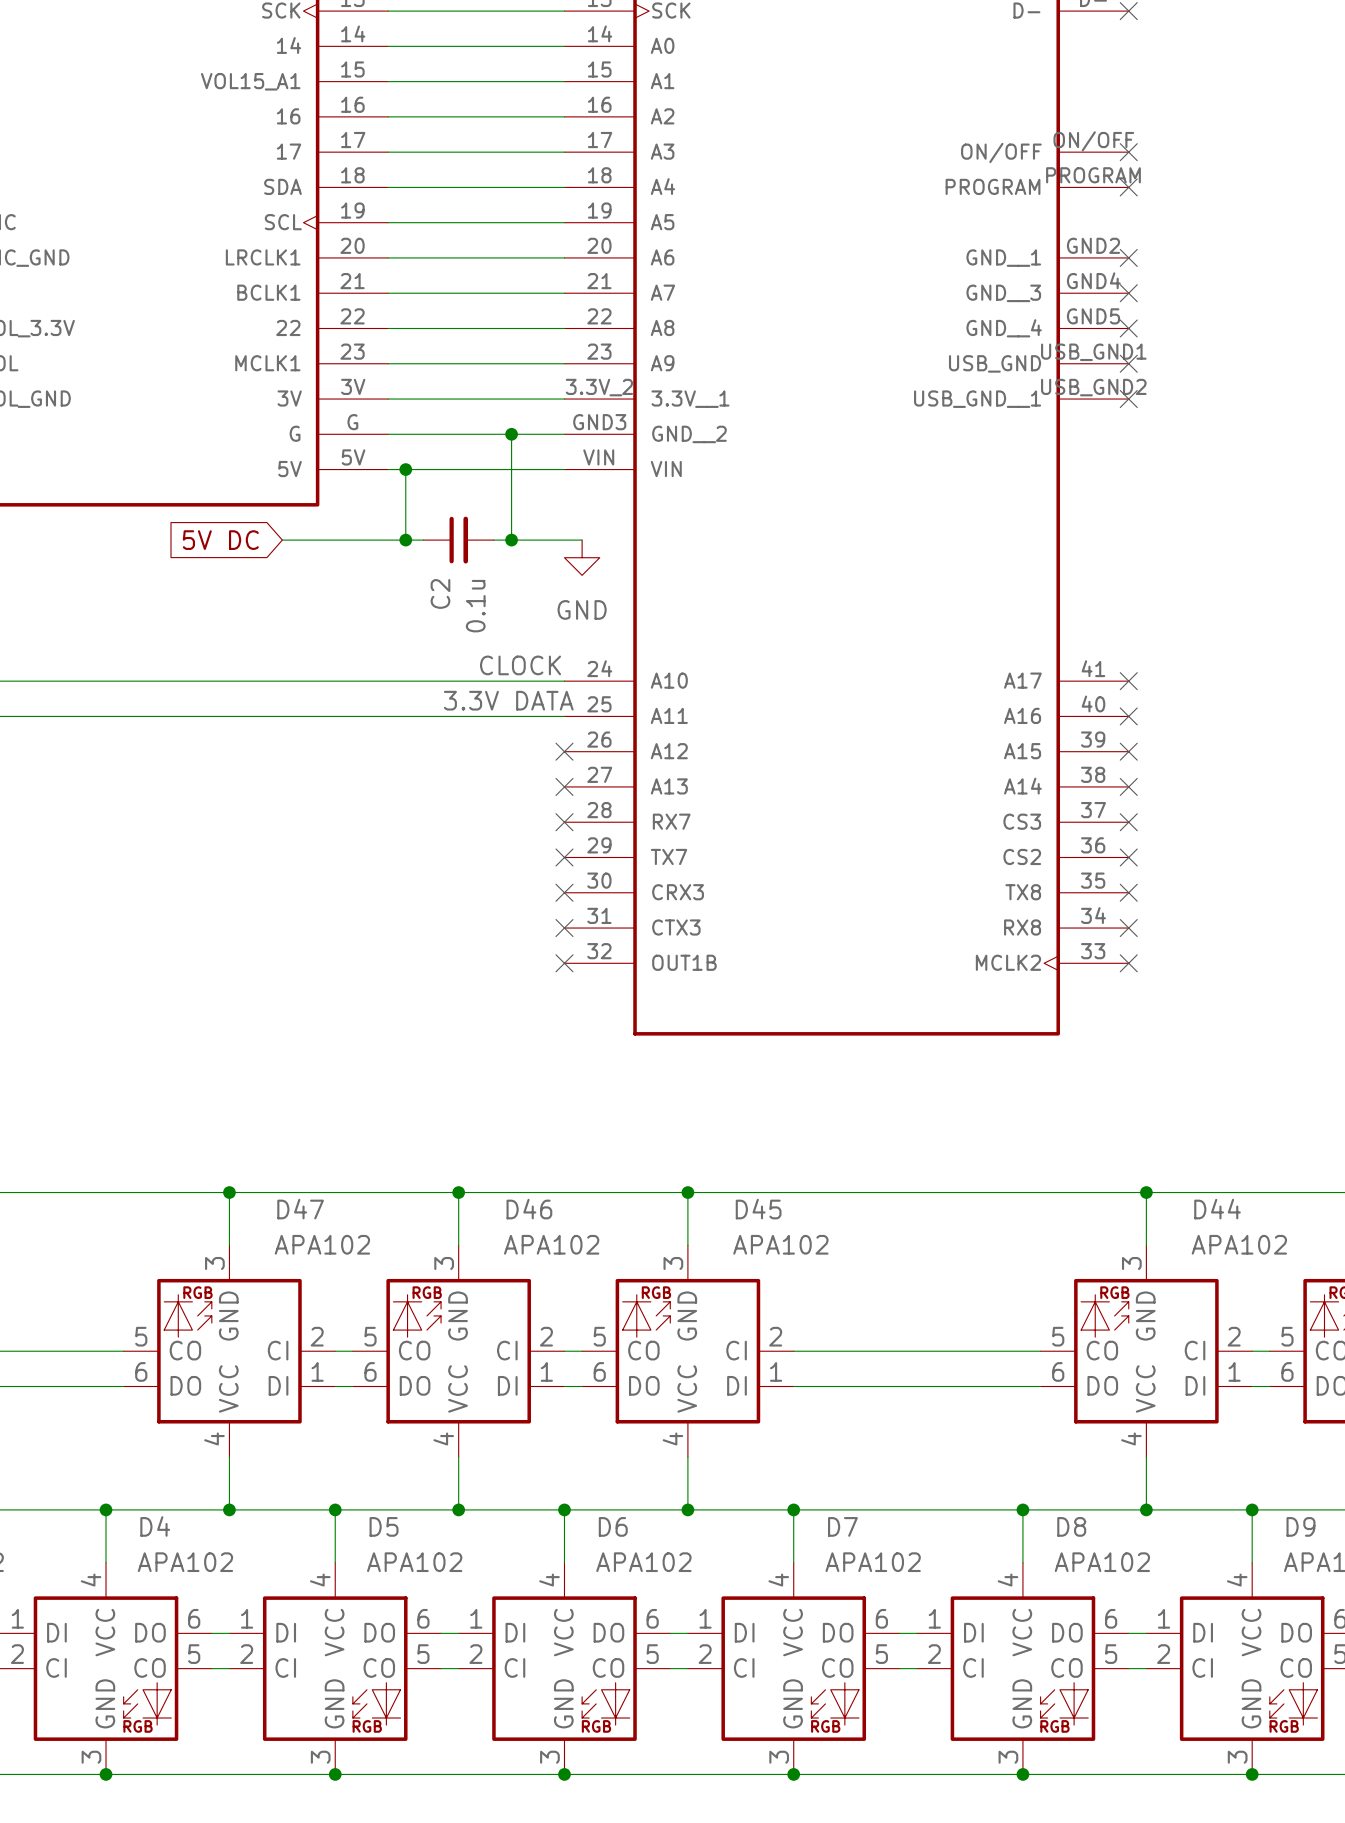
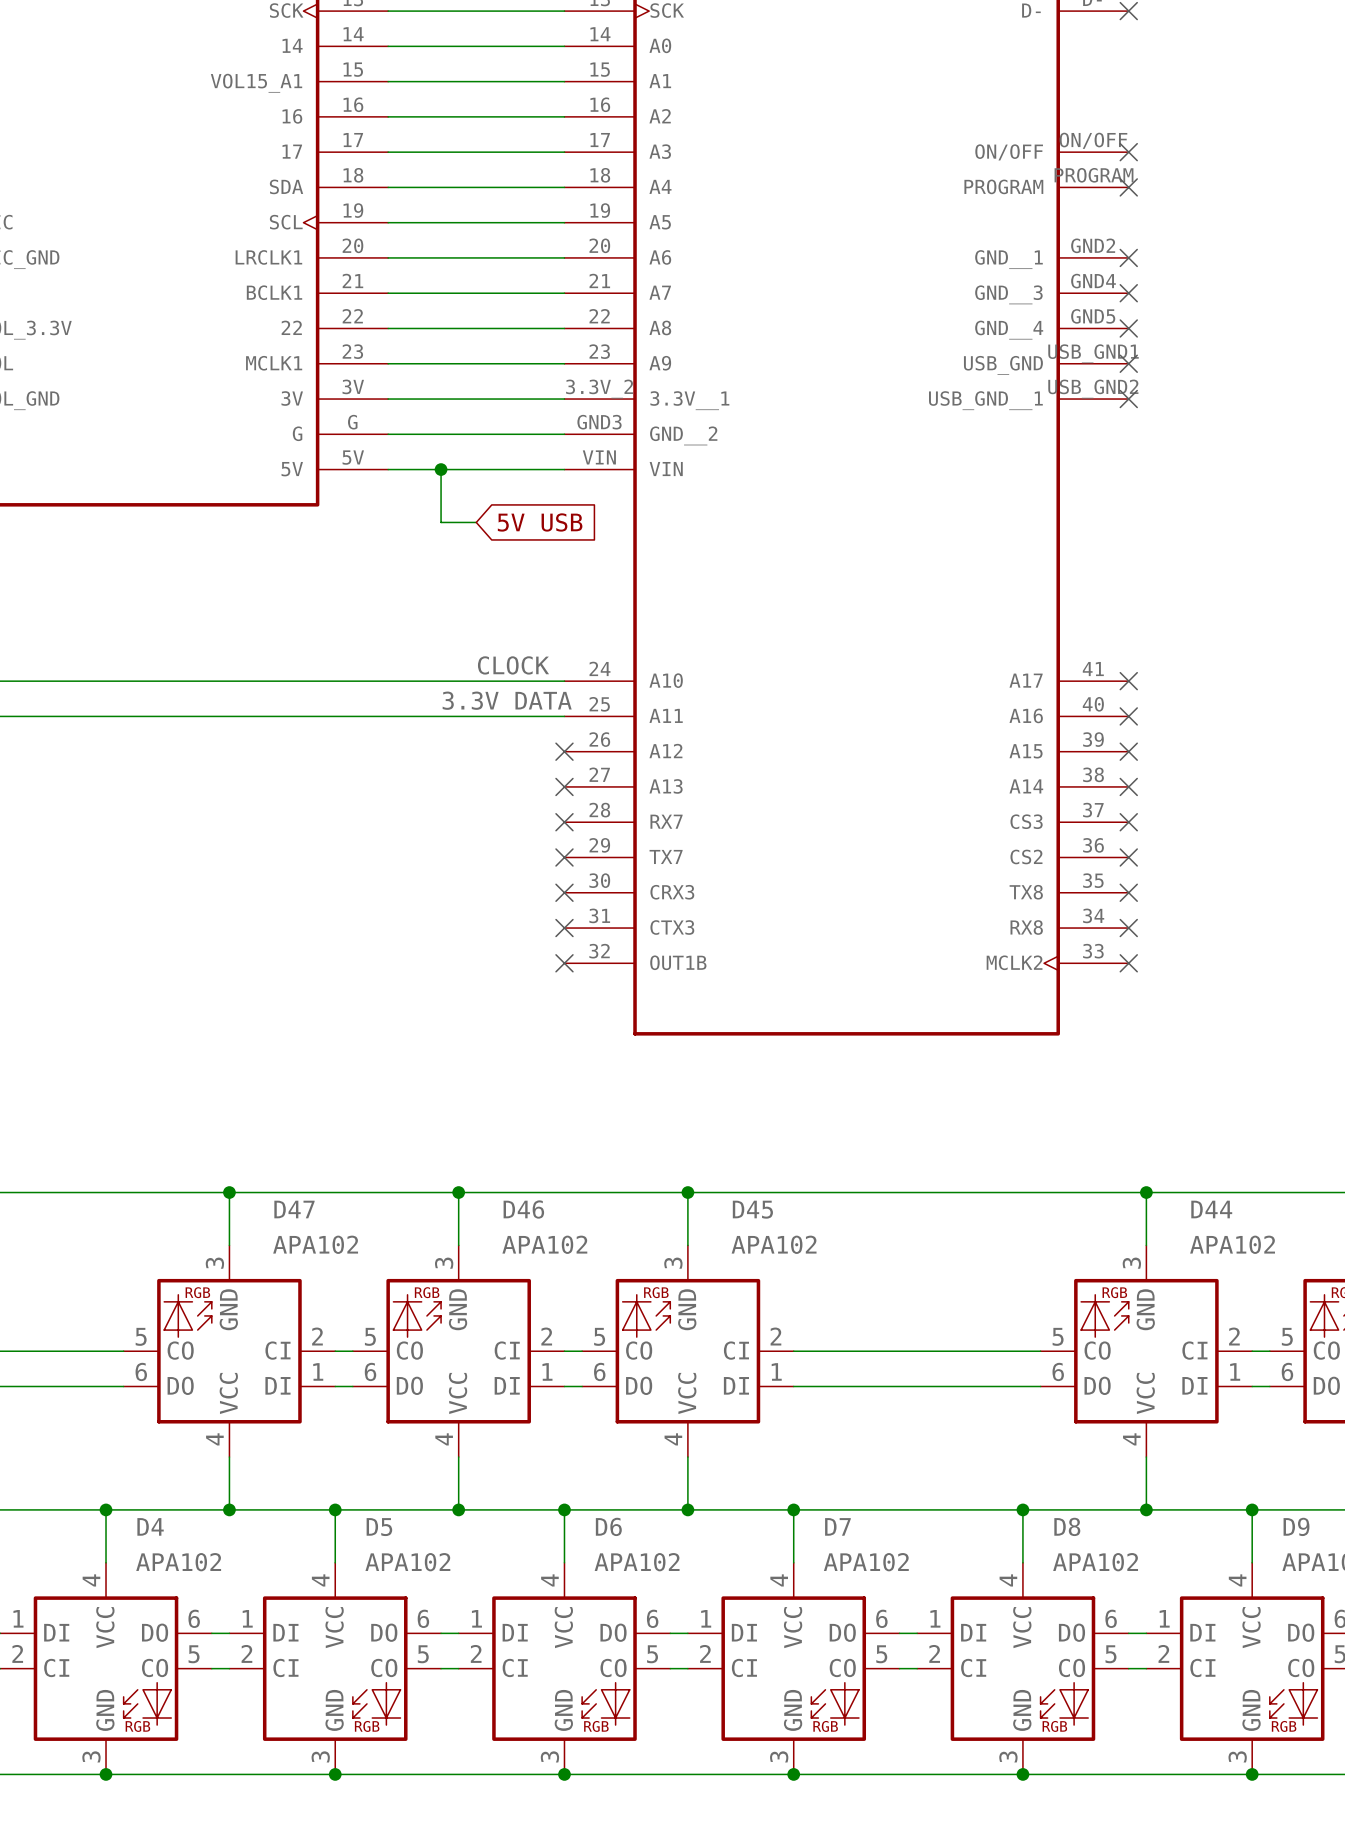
wire: (511, 434) (511, 540) -> none
junction: (511, 434) -> none
wire: (405, 469) (405, 540) -> none
junction position: (405, 469) -> (441, 469)
wire: none -> (441, 469) (441, 522) (476, 522)
global label: none -> 5V USB (540, 522)
global label: 5V DC (220, 540) -> none
wire: (282, 540) (423, 540) -> none
junction: (405, 540) -> none
C2: 0.1u (458, 540) -> none
junction: (511, 540) -> none
power symbol: GND (582, 557) -> none

